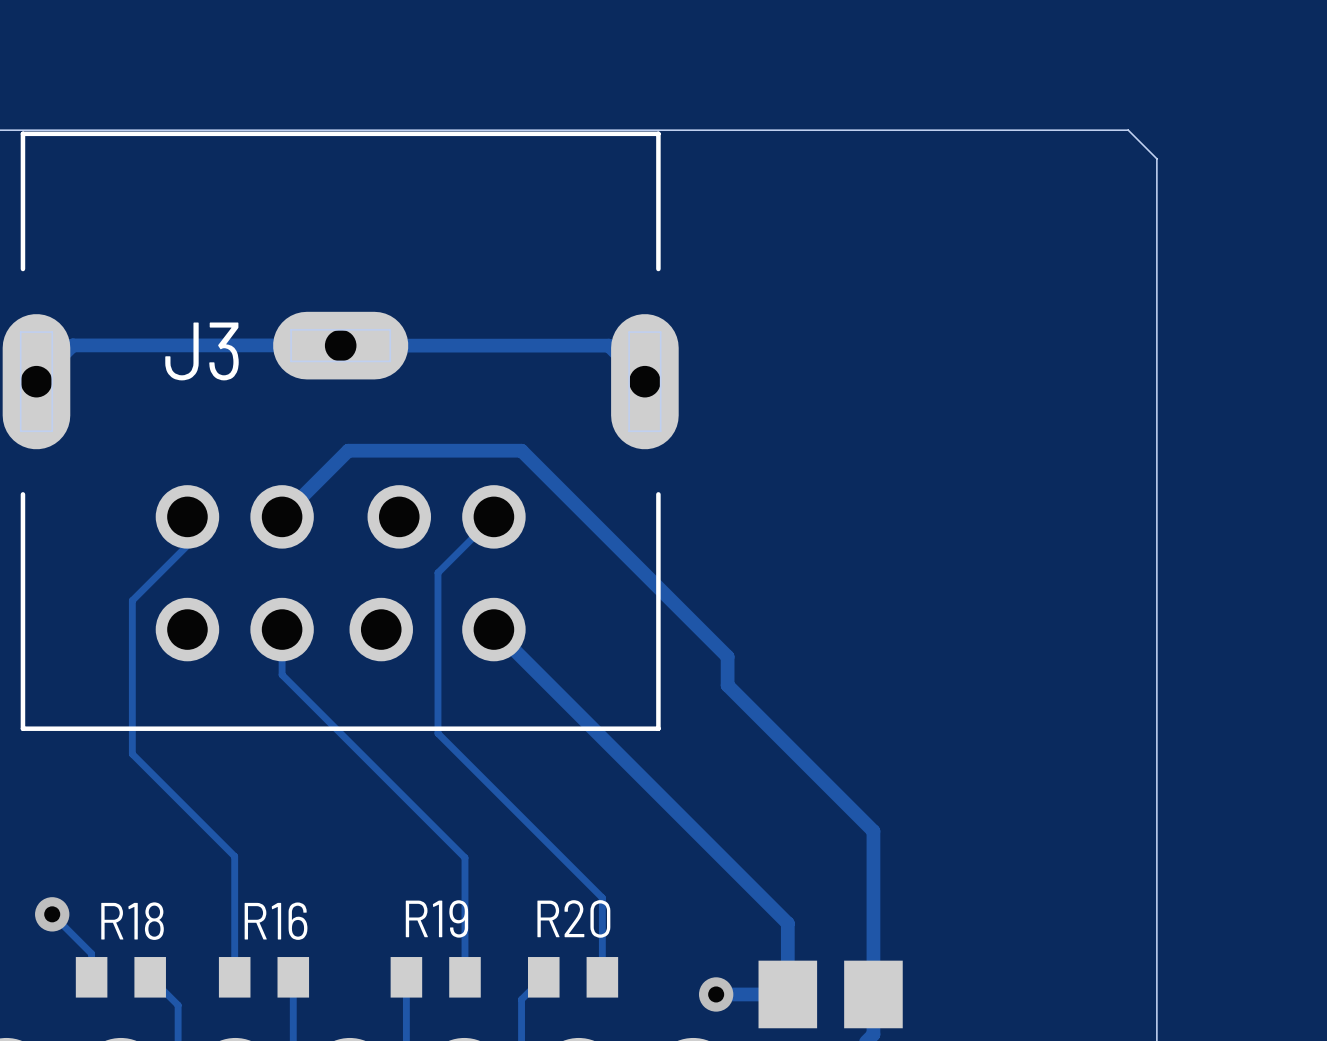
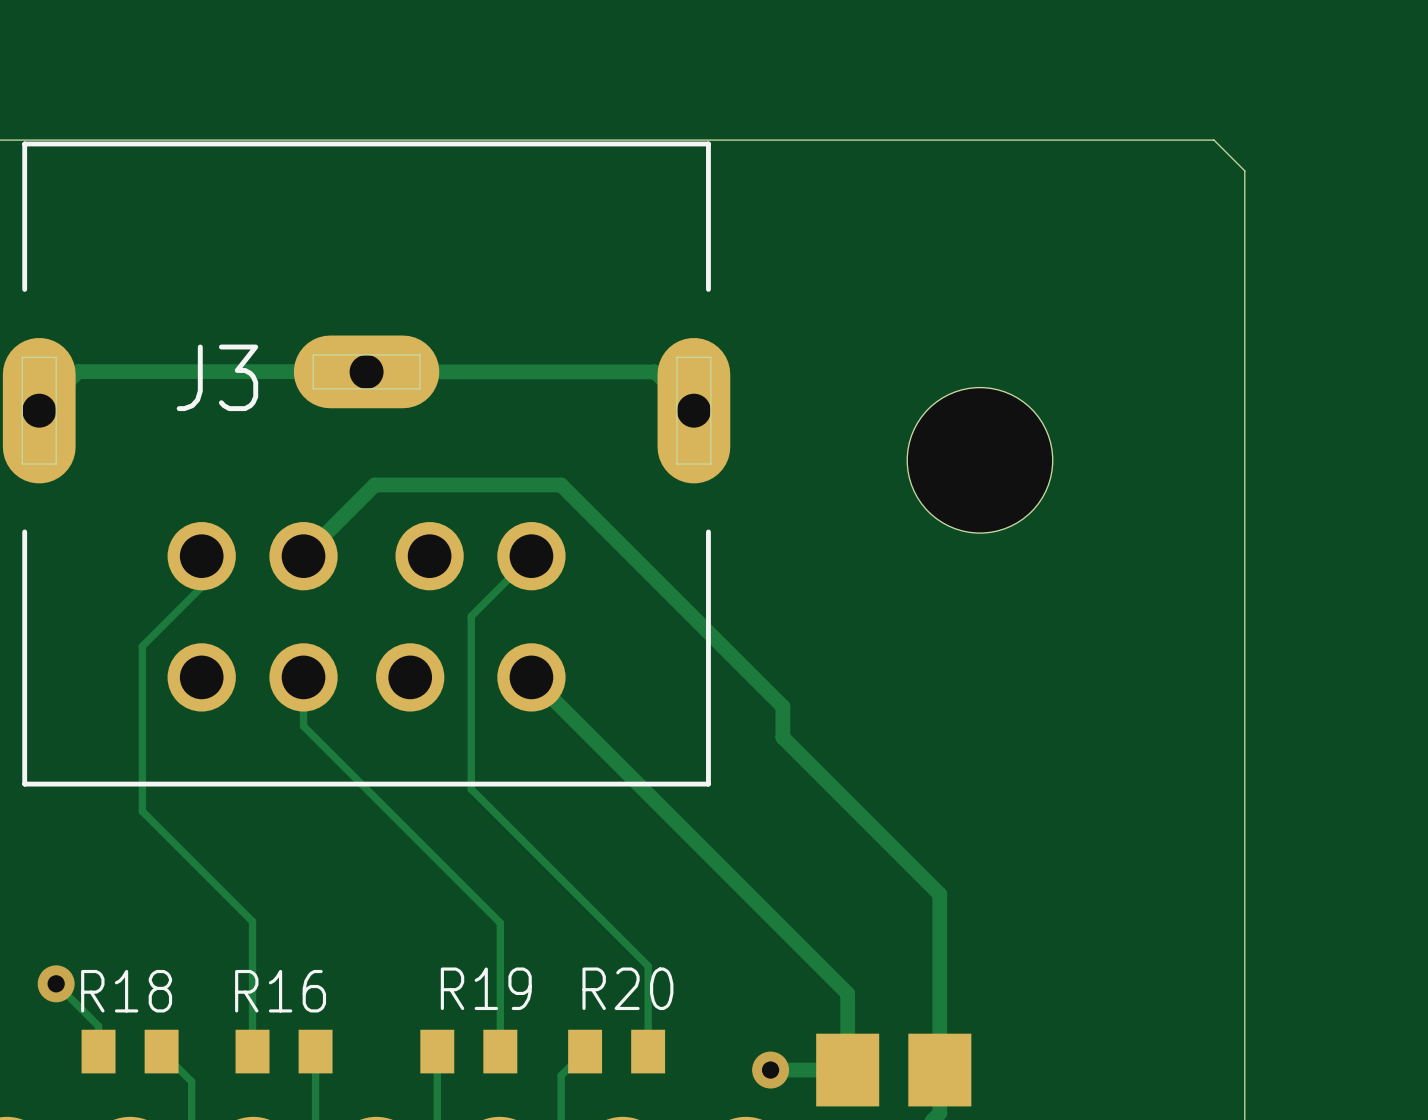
hole: none -> (979, 460)

